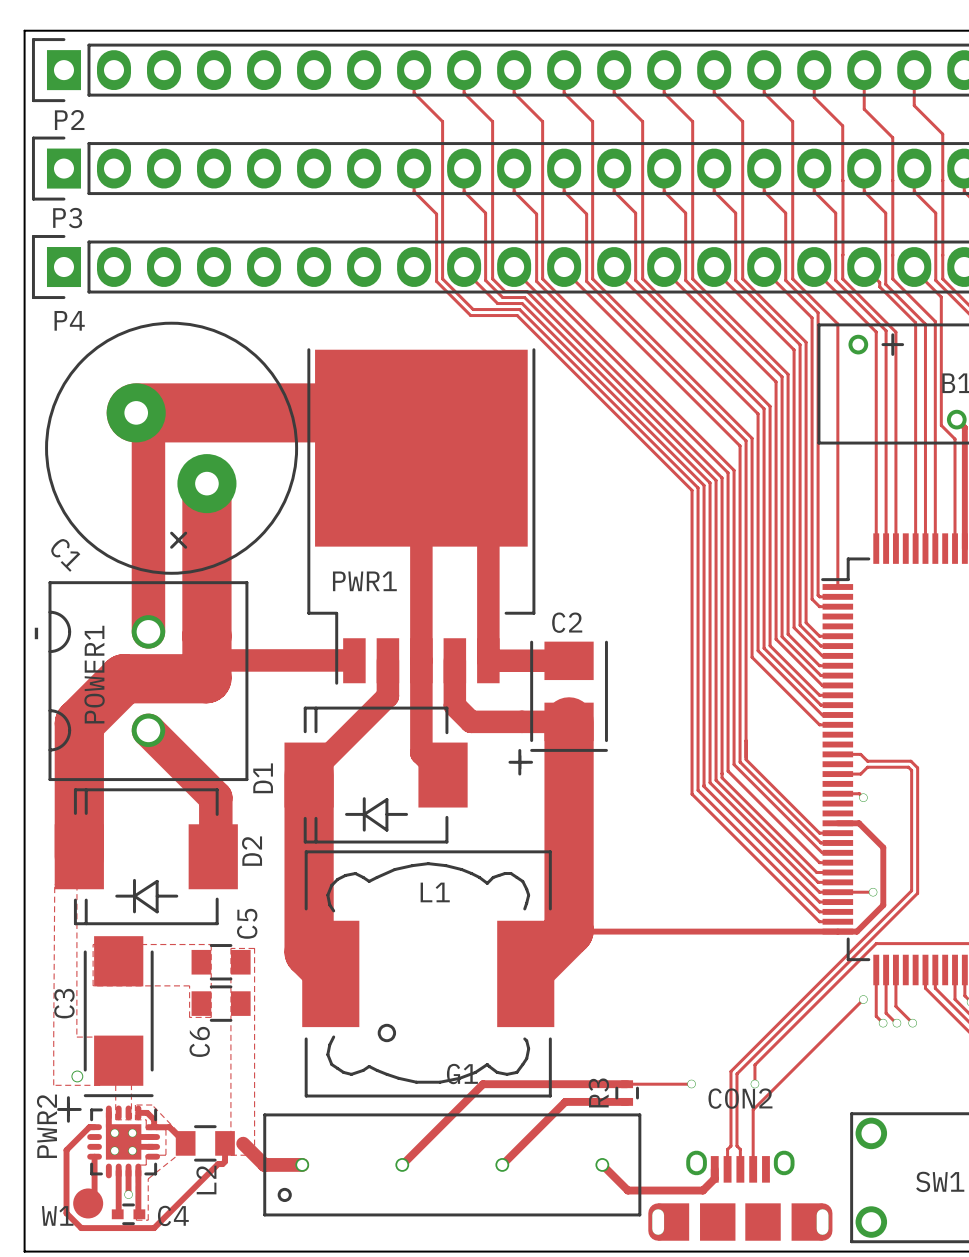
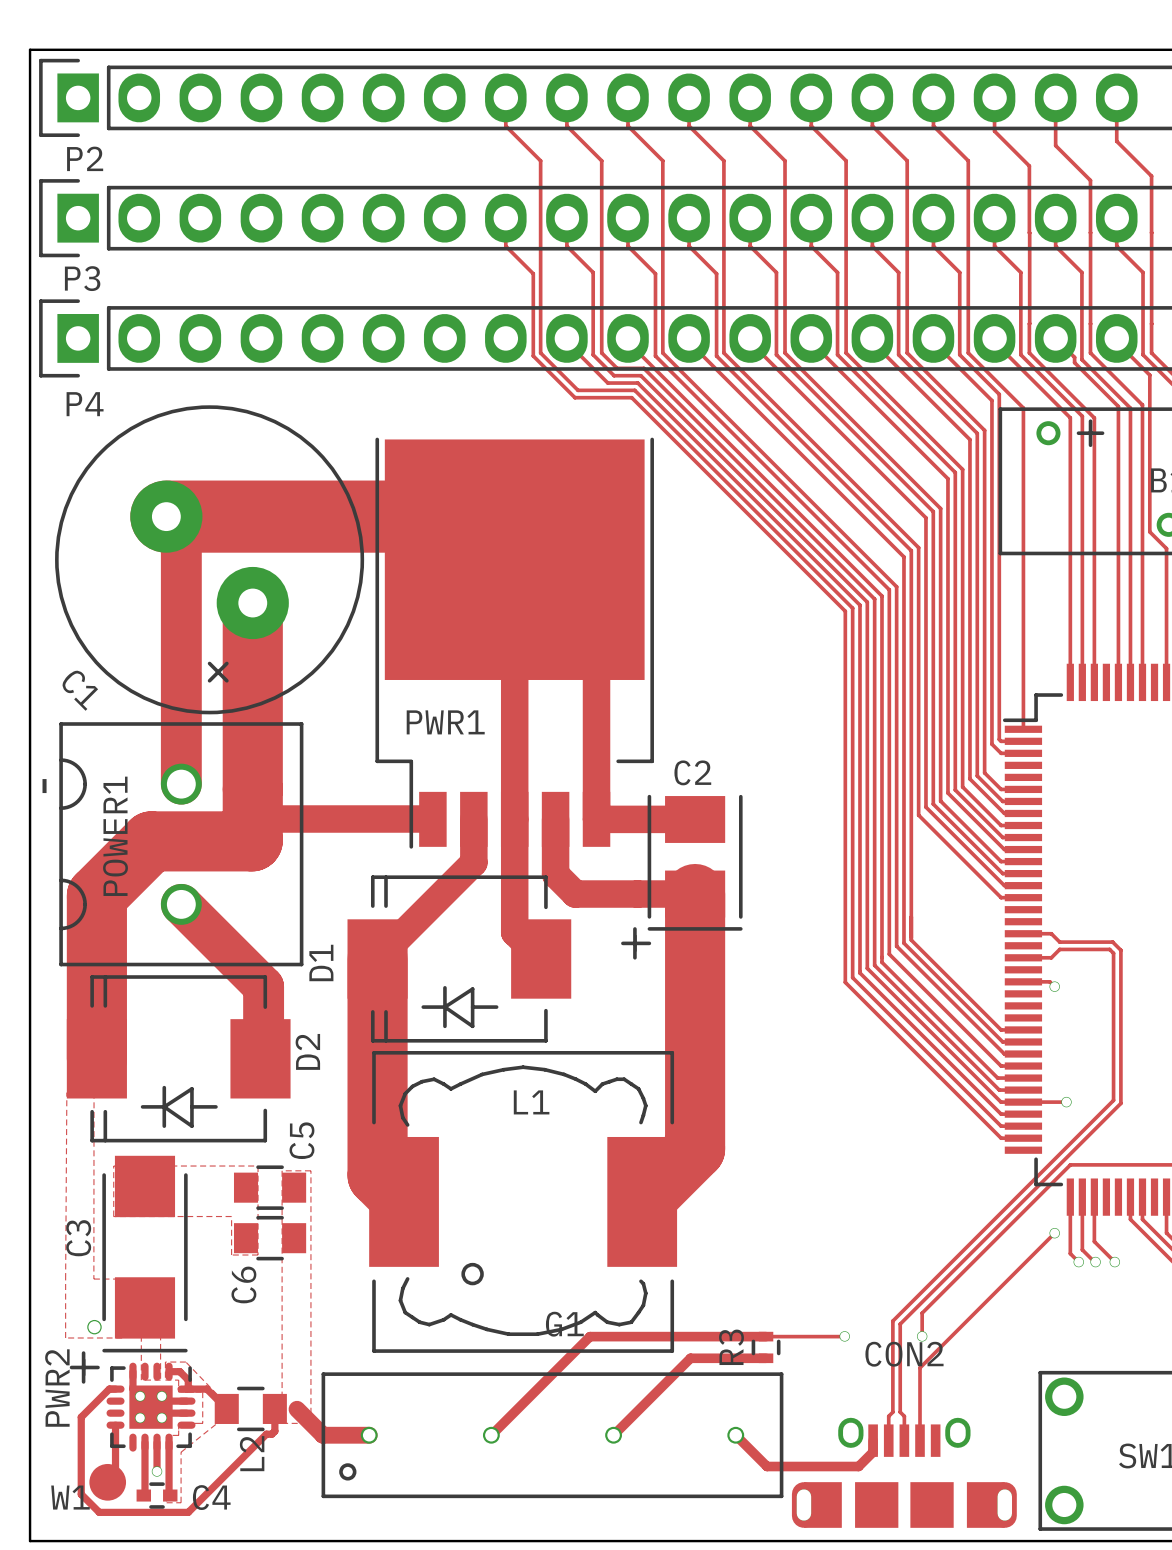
track: (837, 823) (859, 823) (883, 847) (883, 905) (856, 931) (569, 930) -> none

